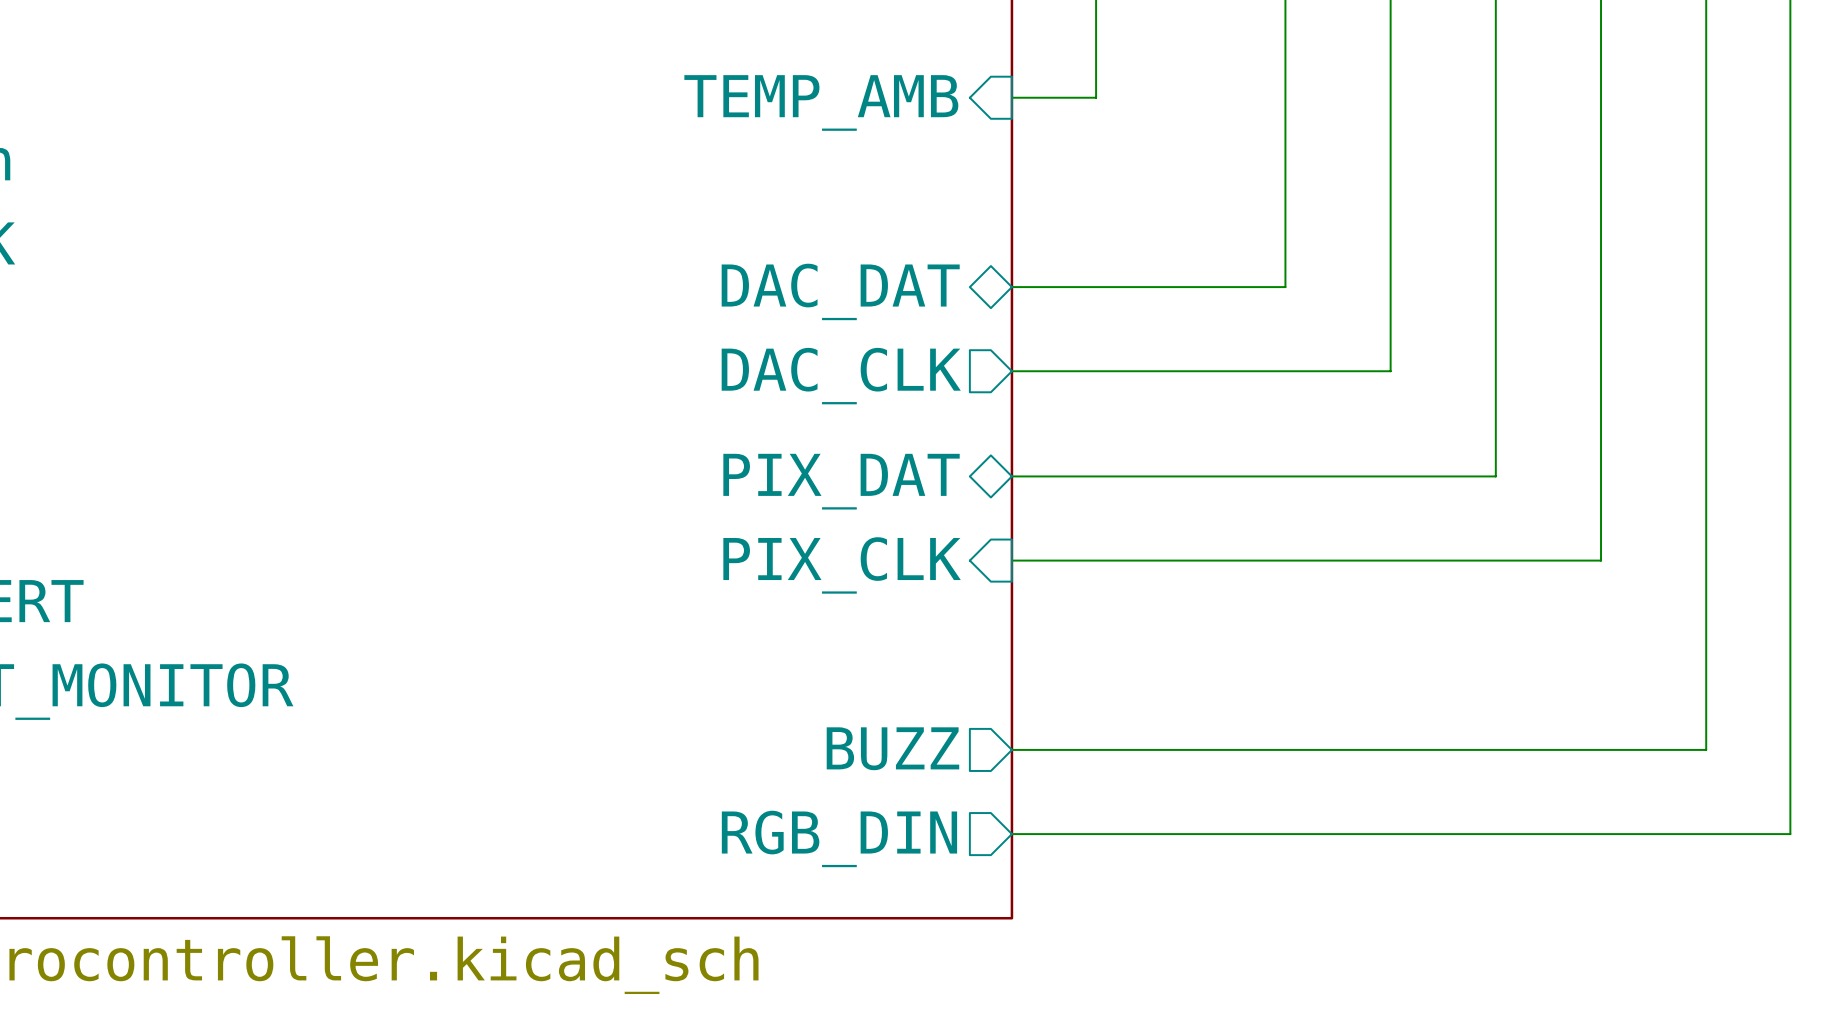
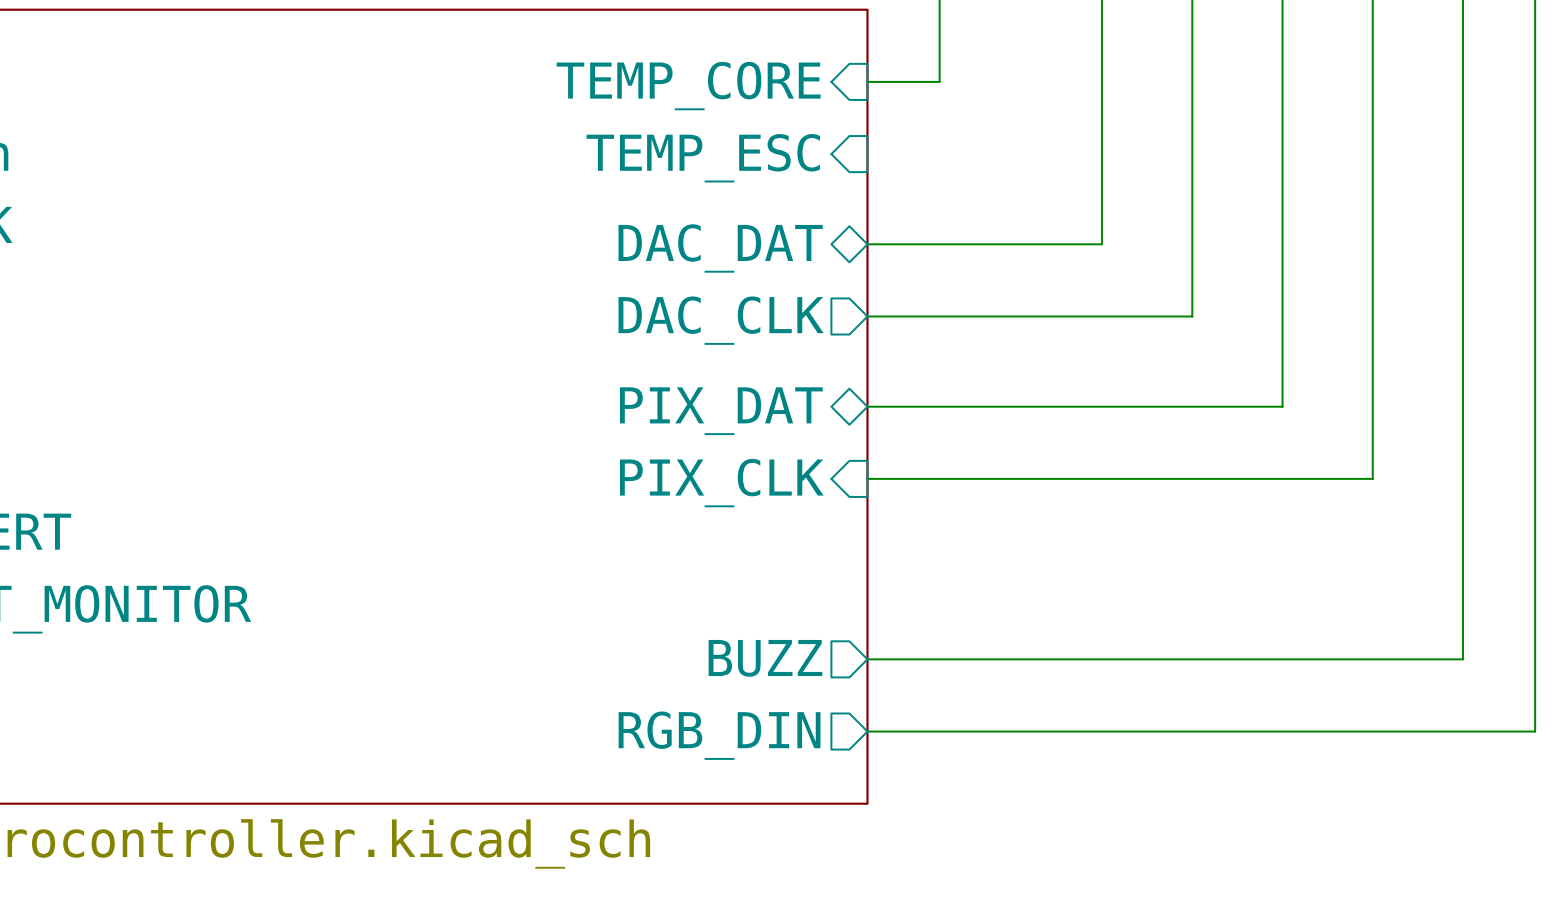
wire: (1096, 76) (1096, 97) (1011, 97) -> (939, 81) (867, 81)
sheet pin: none -> TEMP_CORE (688, 86)
sheet pin: TEMP_AMB (821, 102) -> TEMP_ESC (703, 158)
wire: (1285, 266) (1285, 287) (1011, 287) -> (1102, 244) (867, 244)
sheet pin position: DAC_DAT (840, 291) -> DAC_DAT (720, 248)
wire: (1390, 350) (1390, 371) (1011, 371) -> (1192, 316) (867, 316)
sheet pin position: DAC_CLK (841, 376) -> DAC_CLK (721, 320)
wire: (1495, 455) (1495, 476) (1011, 476) -> (1282, 406) (867, 406)
sheet pin position: PIX_DAT (841, 481) -> PIX_DAT (721, 411)
wire: (1601, 539) (1601, 560) (1011, 560) -> (1372, 478) (867, 478)
sheet pin position: PIX_CLK (842, 565) -> PIX_CLK (721, 483)

